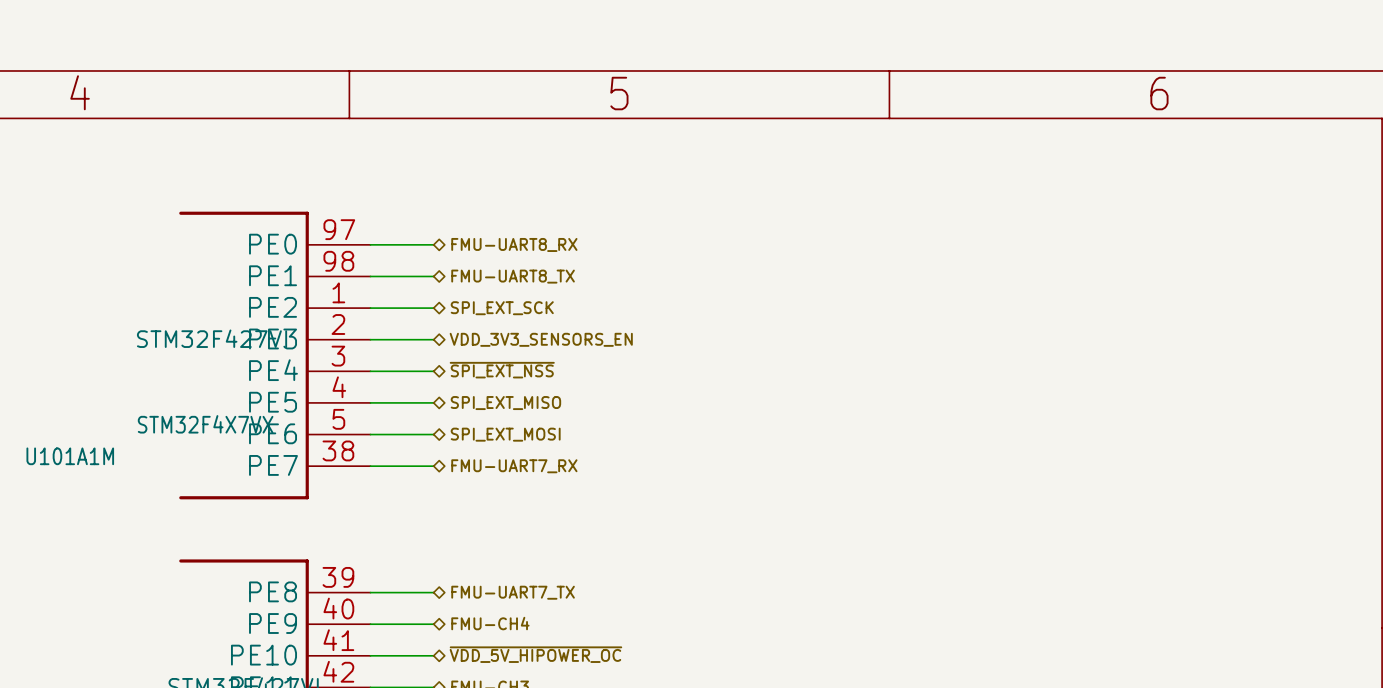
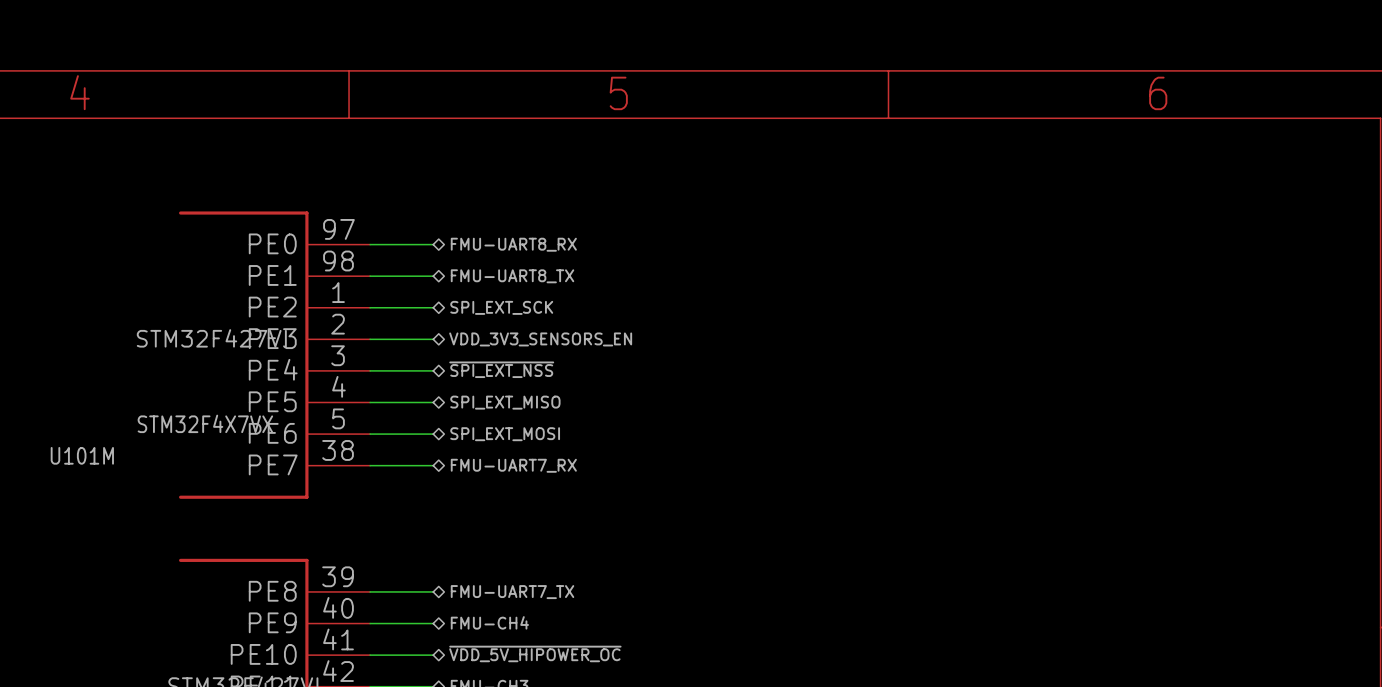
U101A1M name: U101A1M (70, 456) -> U101M (82, 455)

